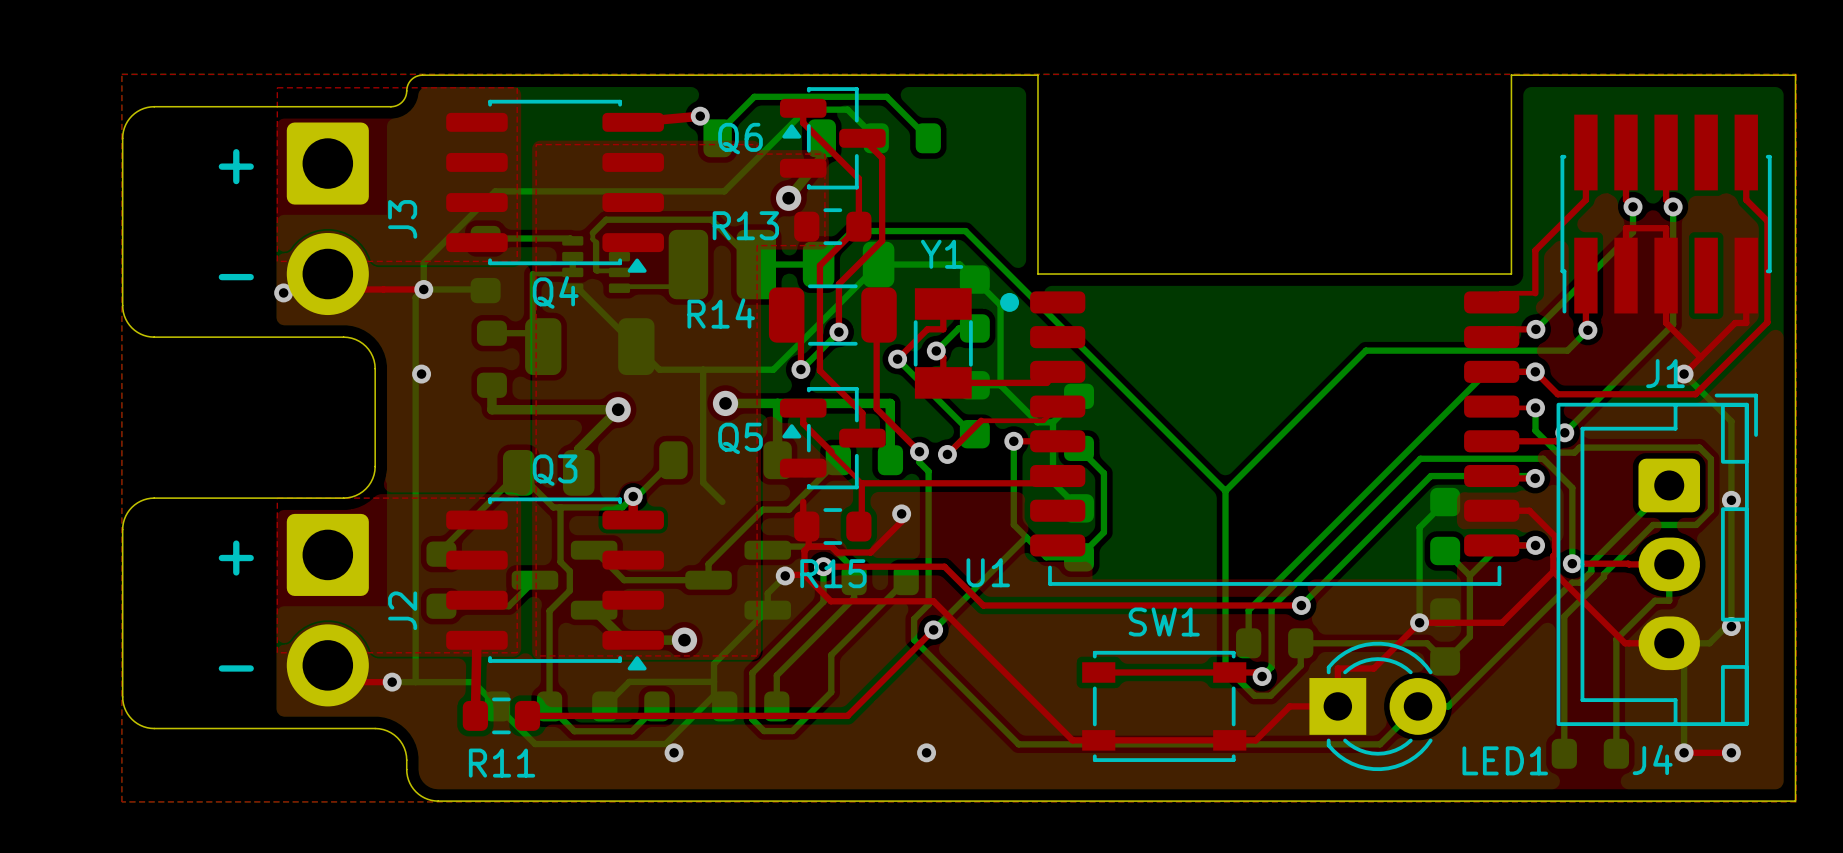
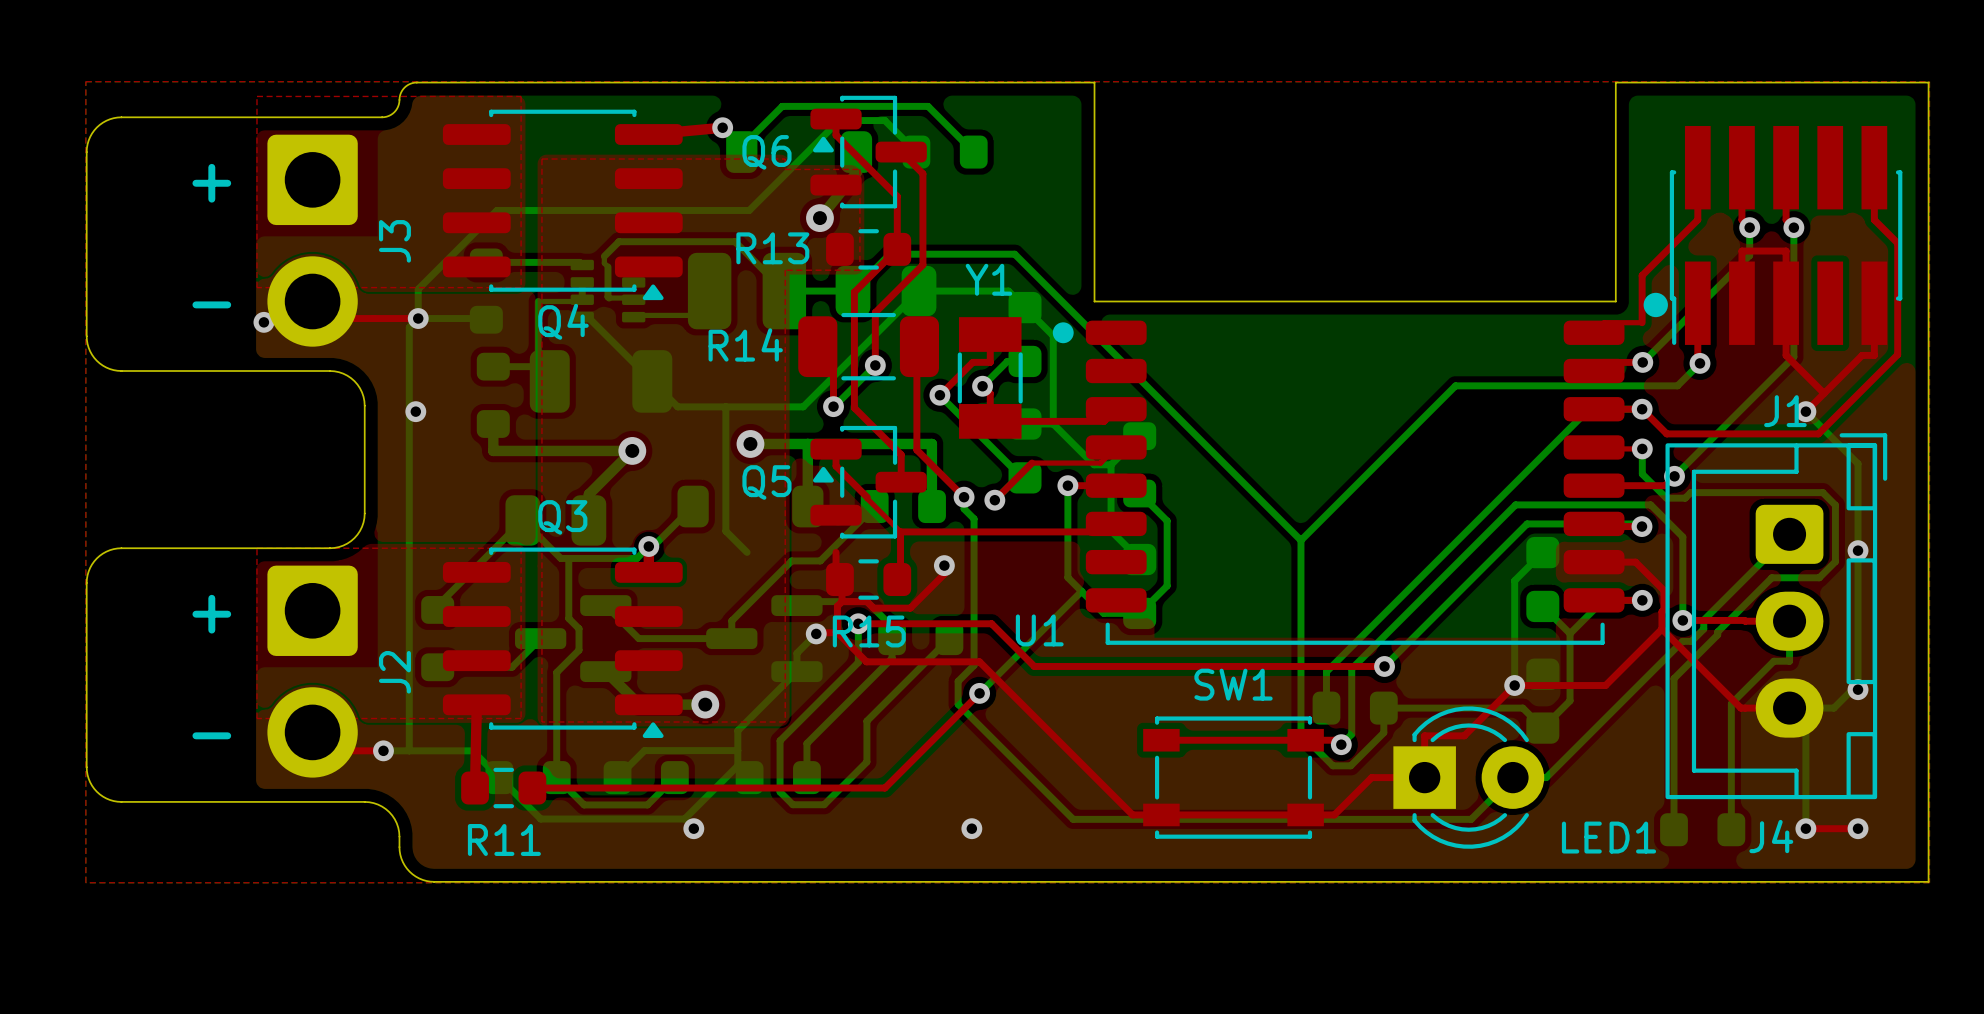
drawing: none -> [1643, 292, 1668, 318]

